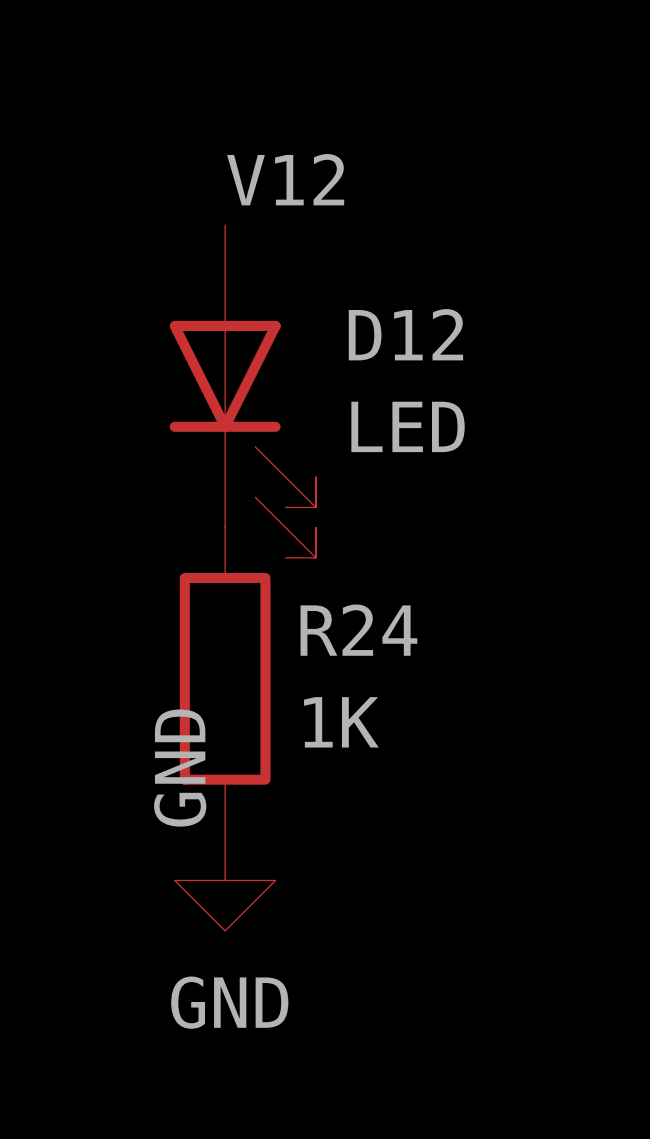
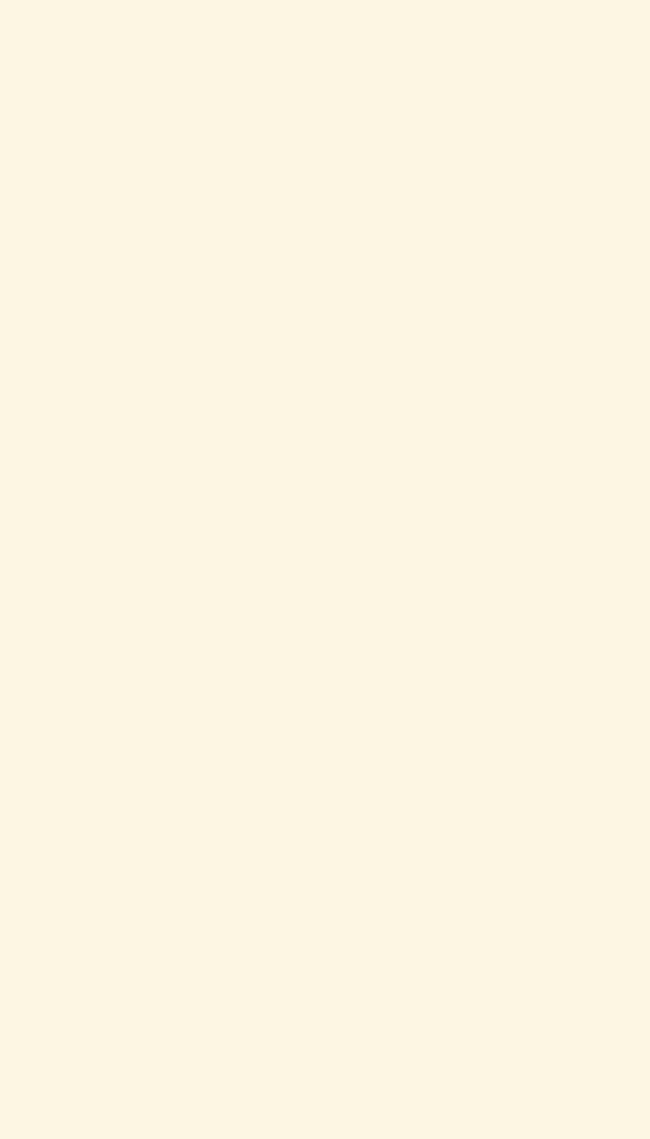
label: V12 (285, 179) -> none
D12: LED (242, 391) -> none
R24: 1K (225, 678) -> none
label: GND (180, 768) -> none
power symbol: GND (225, 880) -> none

